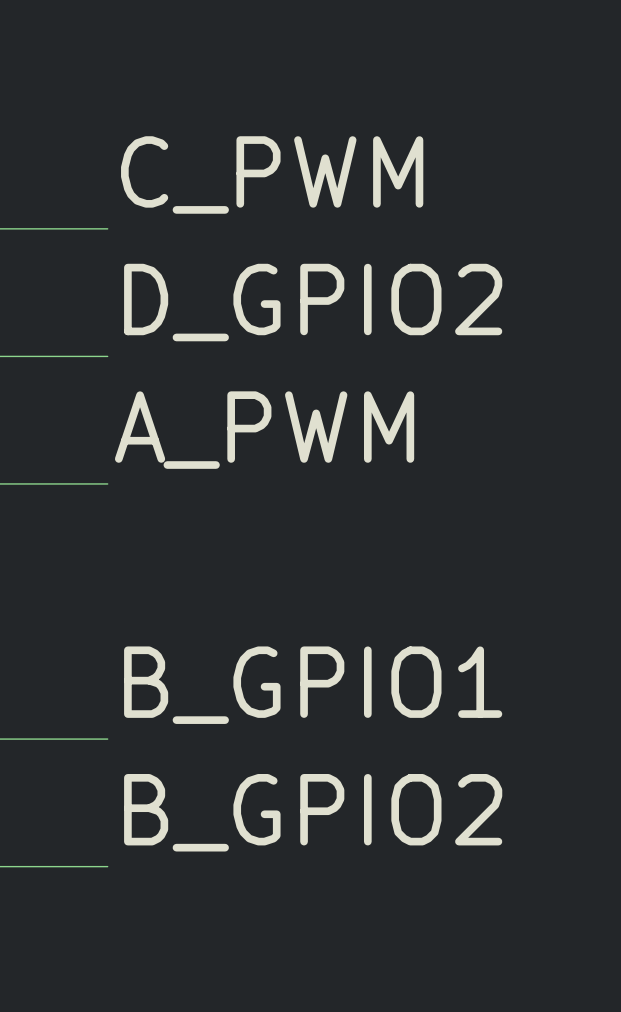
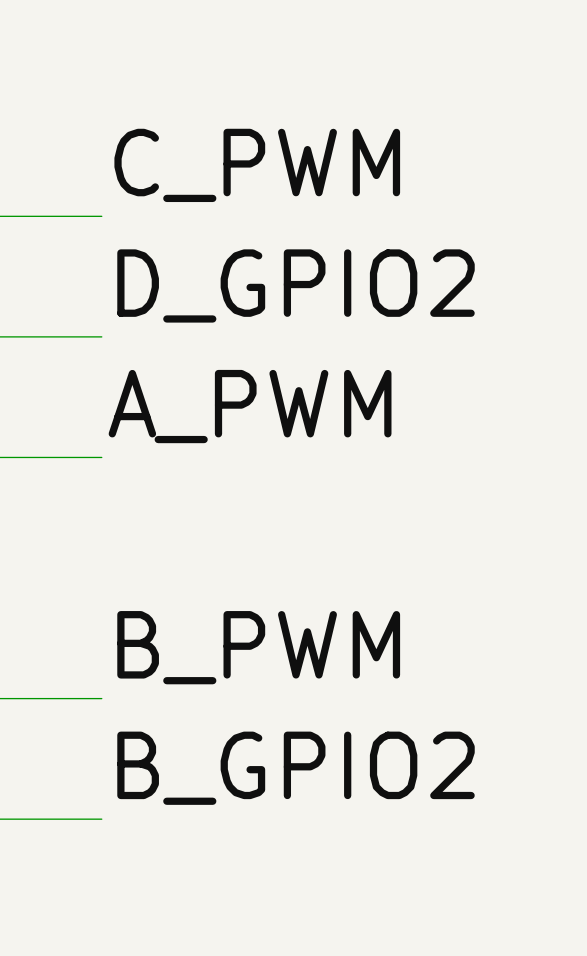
label: B_GPIO1 (313, 685) -> B_PWM (258, 647)

